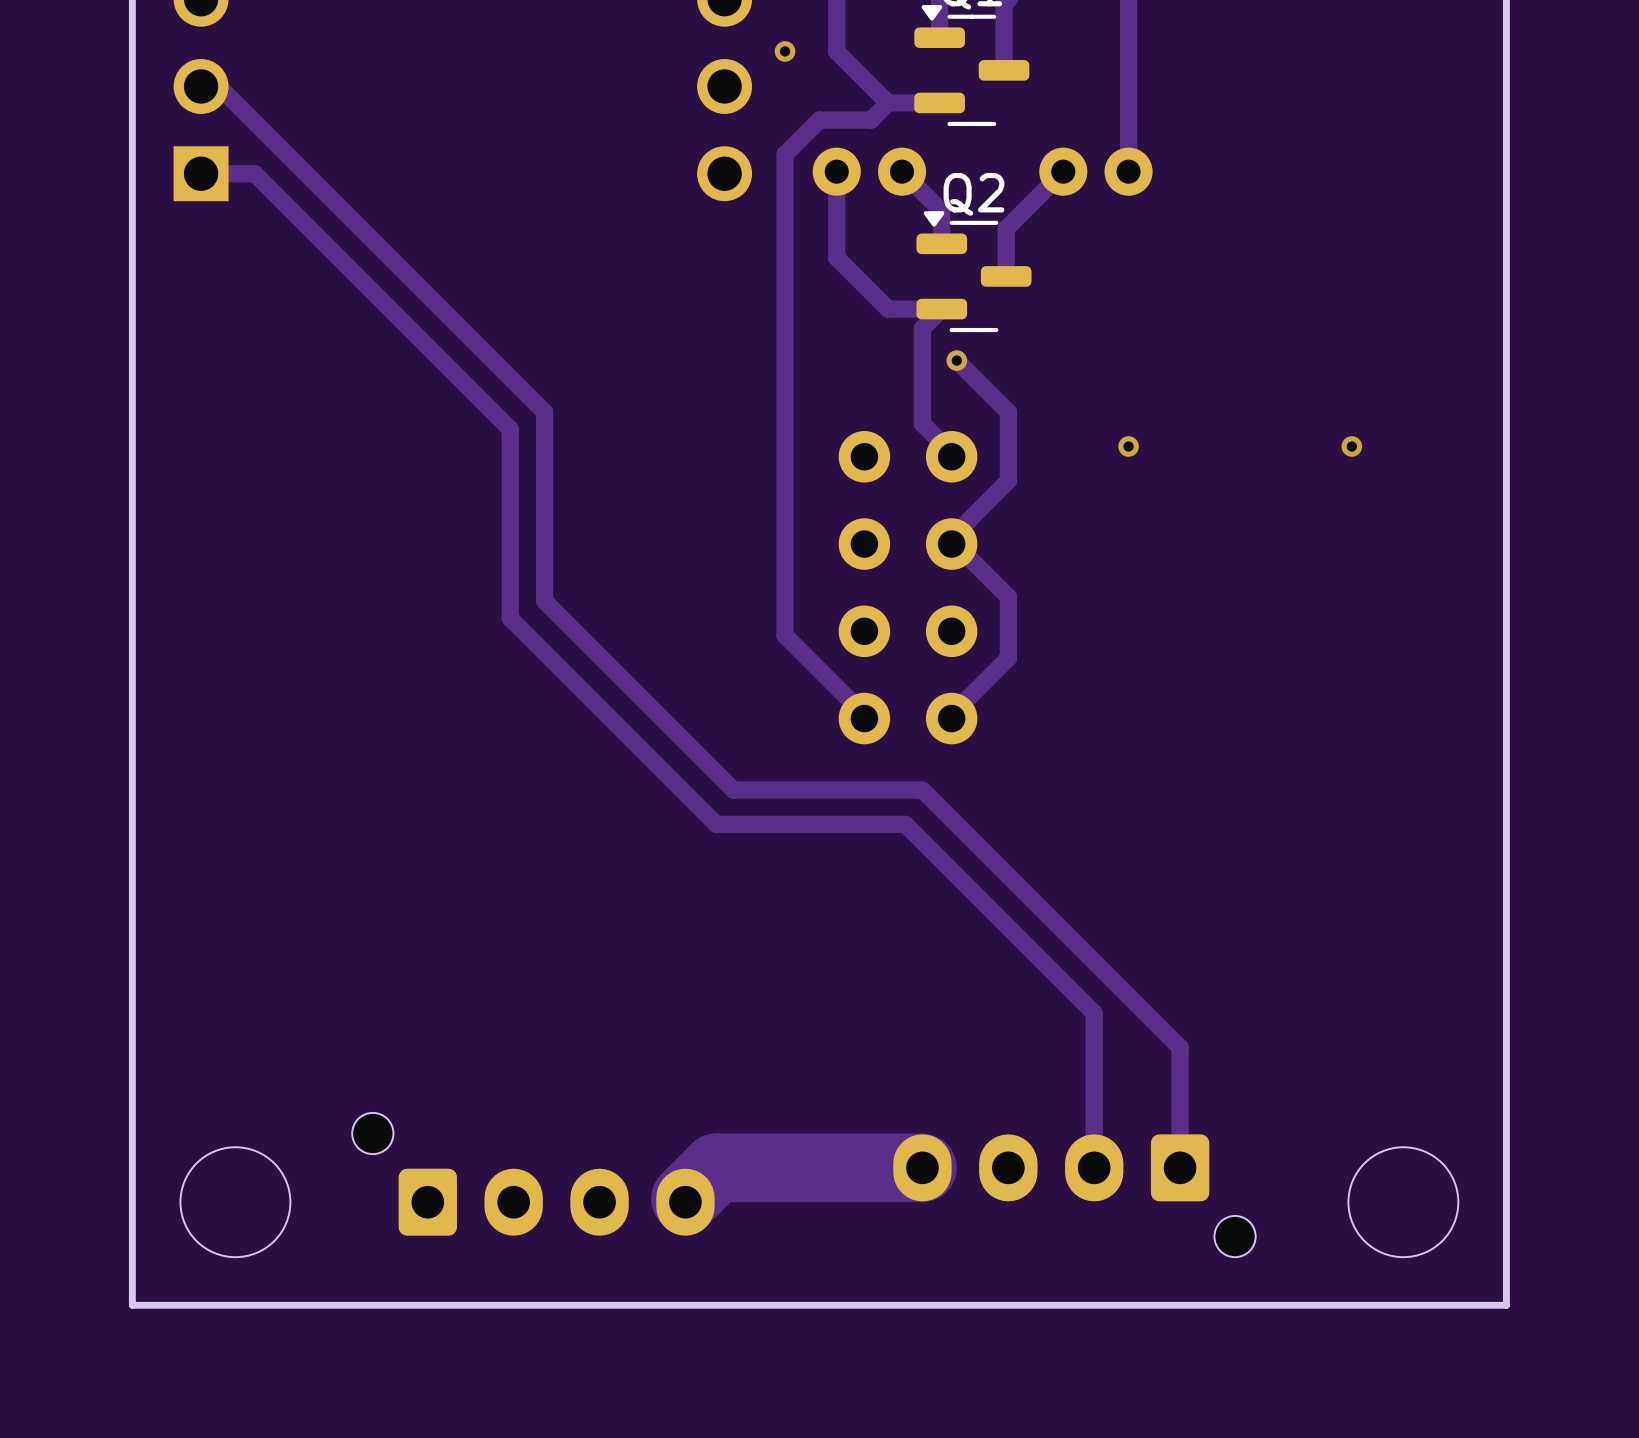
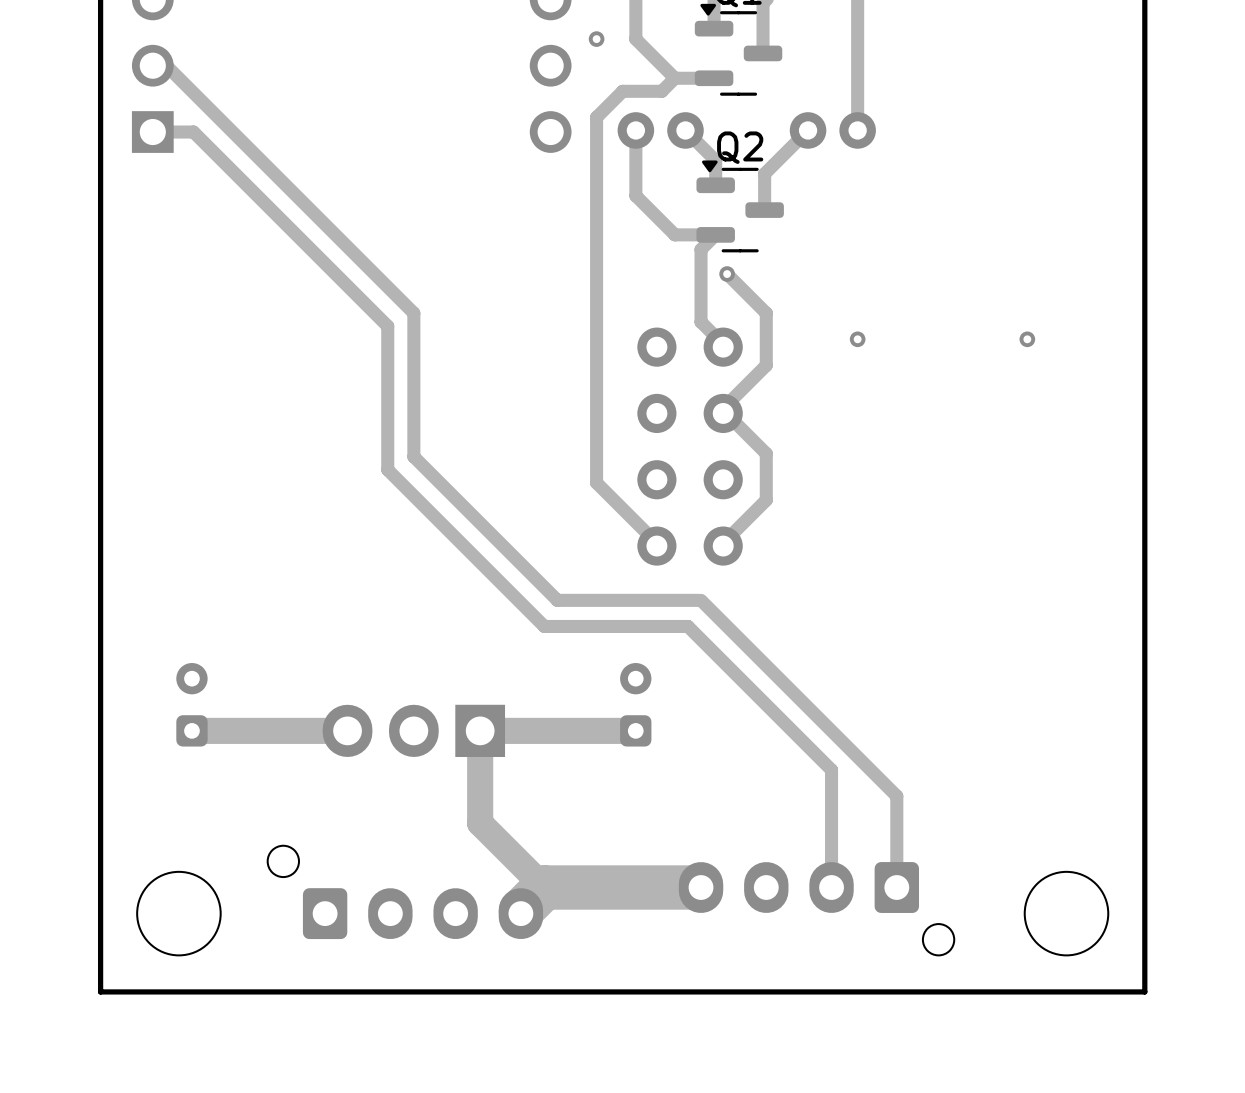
part: none -> (191, 704)
part: none -> (635, 704)
track: none -> (347, 730) (191, 730)
part: none -> (413, 730)
track: none -> (635, 730) (480, 730) (480, 823) (544, 887)
track width: thick (922, 1167) (716, 1167) (685, 1198) -> thin (701, 887) (544, 887) (520, 911)

